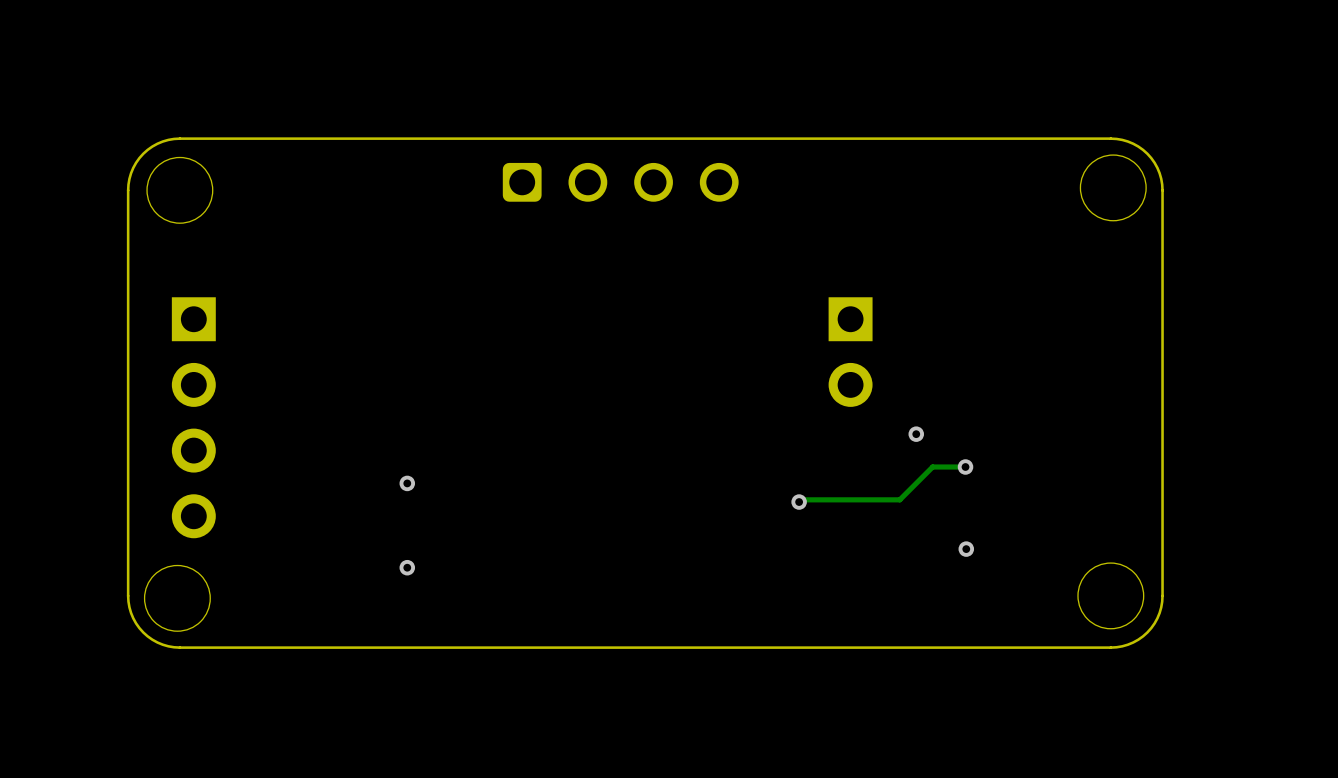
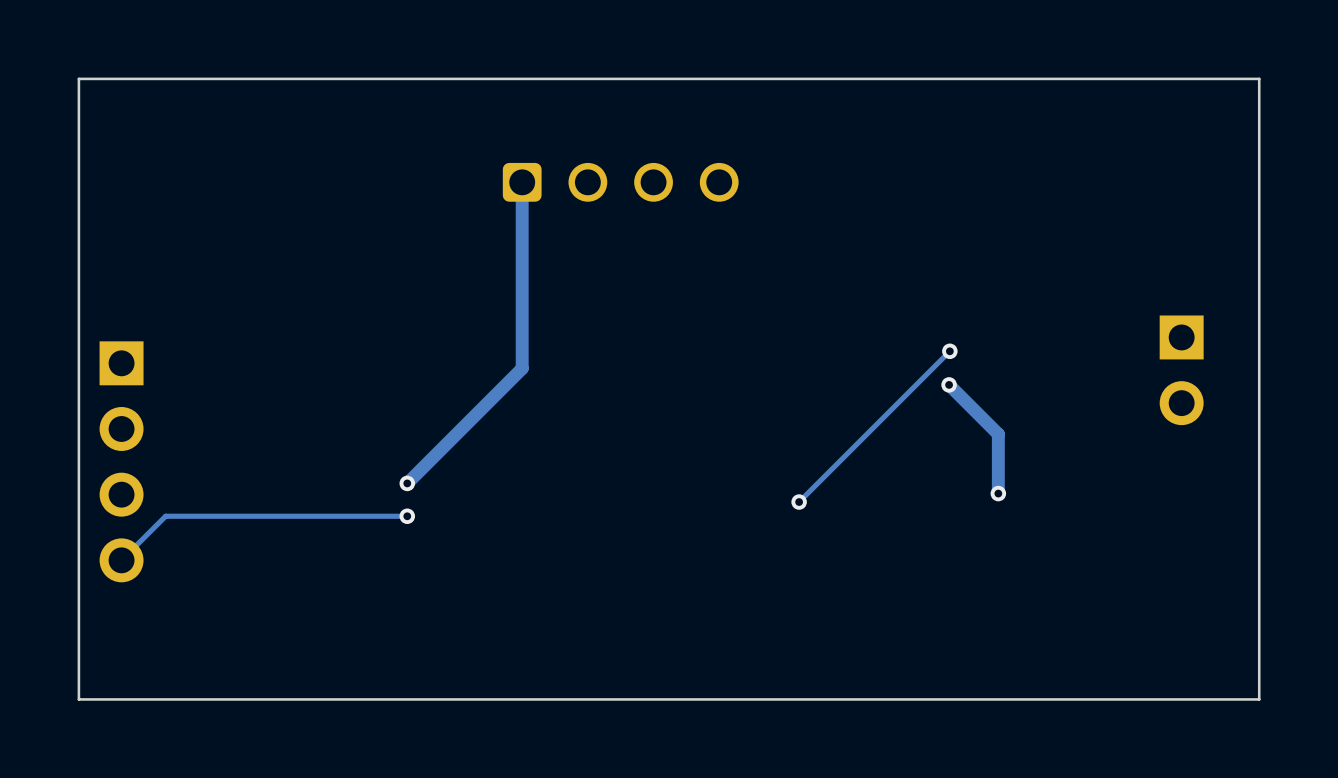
board edge: (1110, 138) (179, 138) (157, 143) (147, 149) (136, 162) (129, 178) (128, 190) (128, 595) (133, 618) (139, 628) (152, 639) (162, 644) (179, 647) (1110, 647) (1133, 642) (1143, 636) (1154, 623) (1162, 601) (1162, 190) (1159, 173) (1147, 153) (1127, 141) (1110, 138) -> (1259, 78) (1259, 699) (78, 699) (78, 78) (1259, 78)
round board edge: [1079, 154, 1147, 222] -> none
round board edge: [146, 156, 214, 224] -> none
track: none -> (522, 182) (522, 368) (407, 483)
track: none -> (949, 351) (801, 499)
via: none -> (949, 351)
part position: (850, 352) -> (1181, 370)
track: none -> (949, 384) (998, 434) (998, 493)
via: none -> (949, 384)
part position: (193, 417) -> (121, 461)
via: (916, 434) -> none
track: (965, 467) (932, 467) (899, 499) (801, 499) (799, 502) -> none
via: (965, 467) -> none
via: none -> (998, 493)
track: none -> (407, 516) (165, 516) (121, 560)
via: (966, 549) -> none
round board edge: [1077, 562, 1145, 630] -> none
round board edge: [143, 564, 211, 632] -> none
via position: (407, 567) -> (407, 516)

